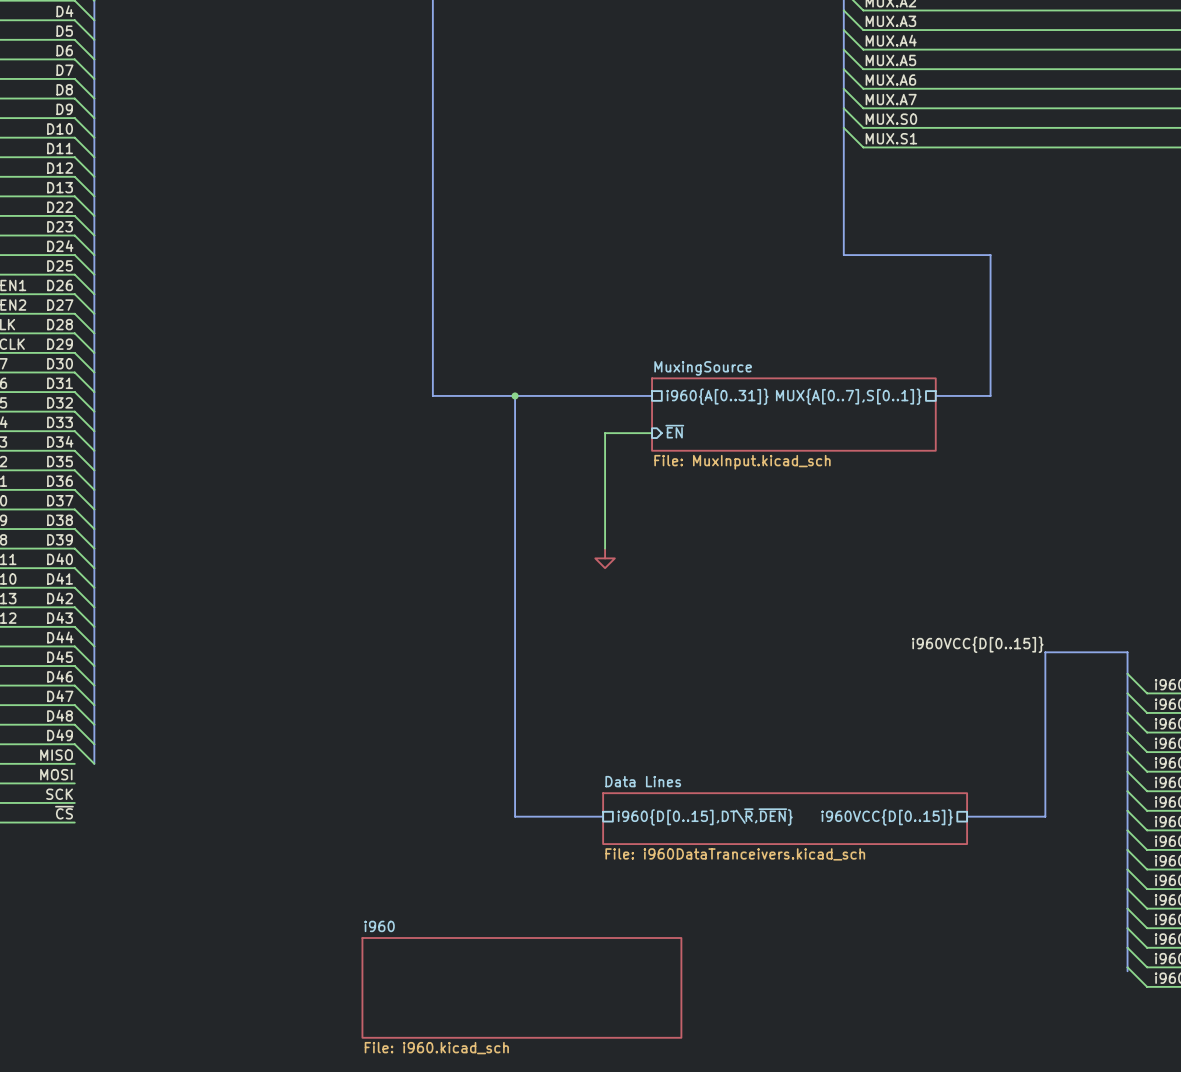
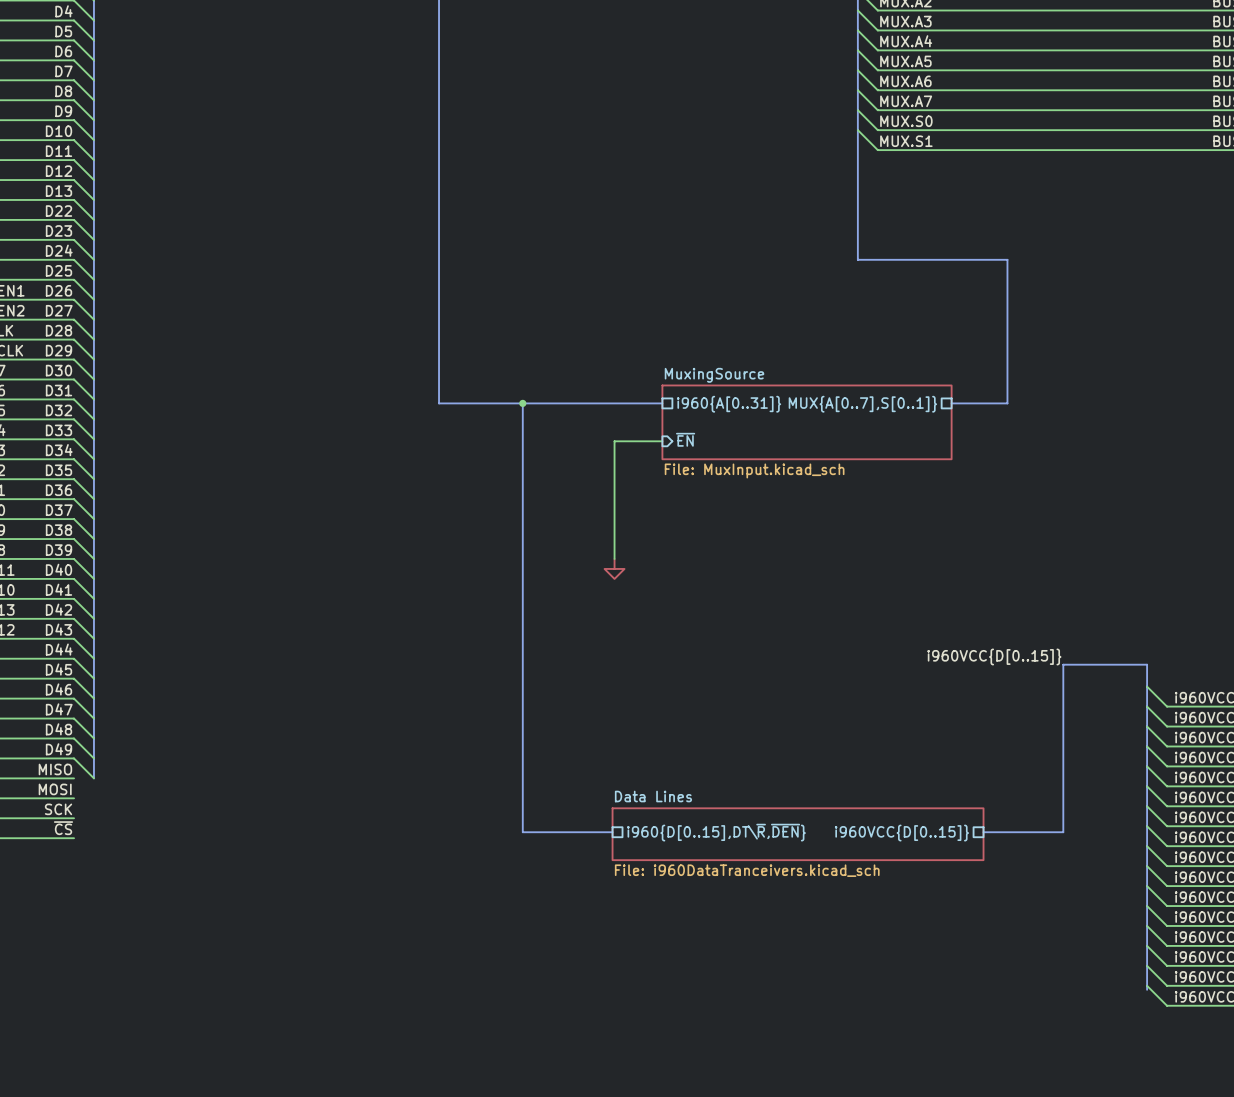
sheet i960: File: i960.kicad_sch (521, 987) -> none

